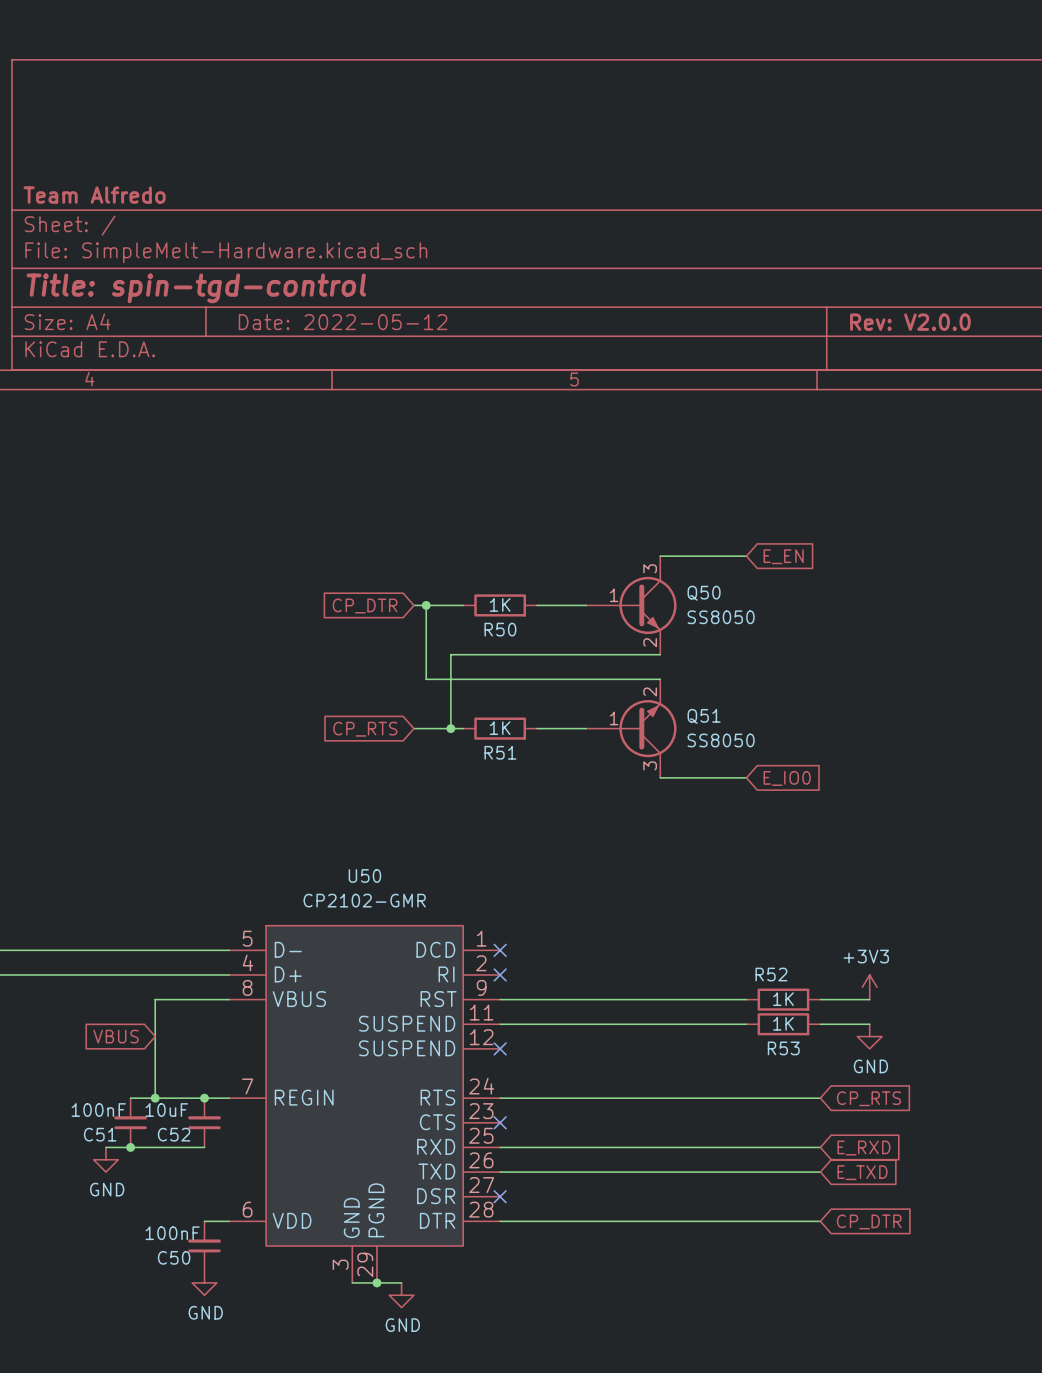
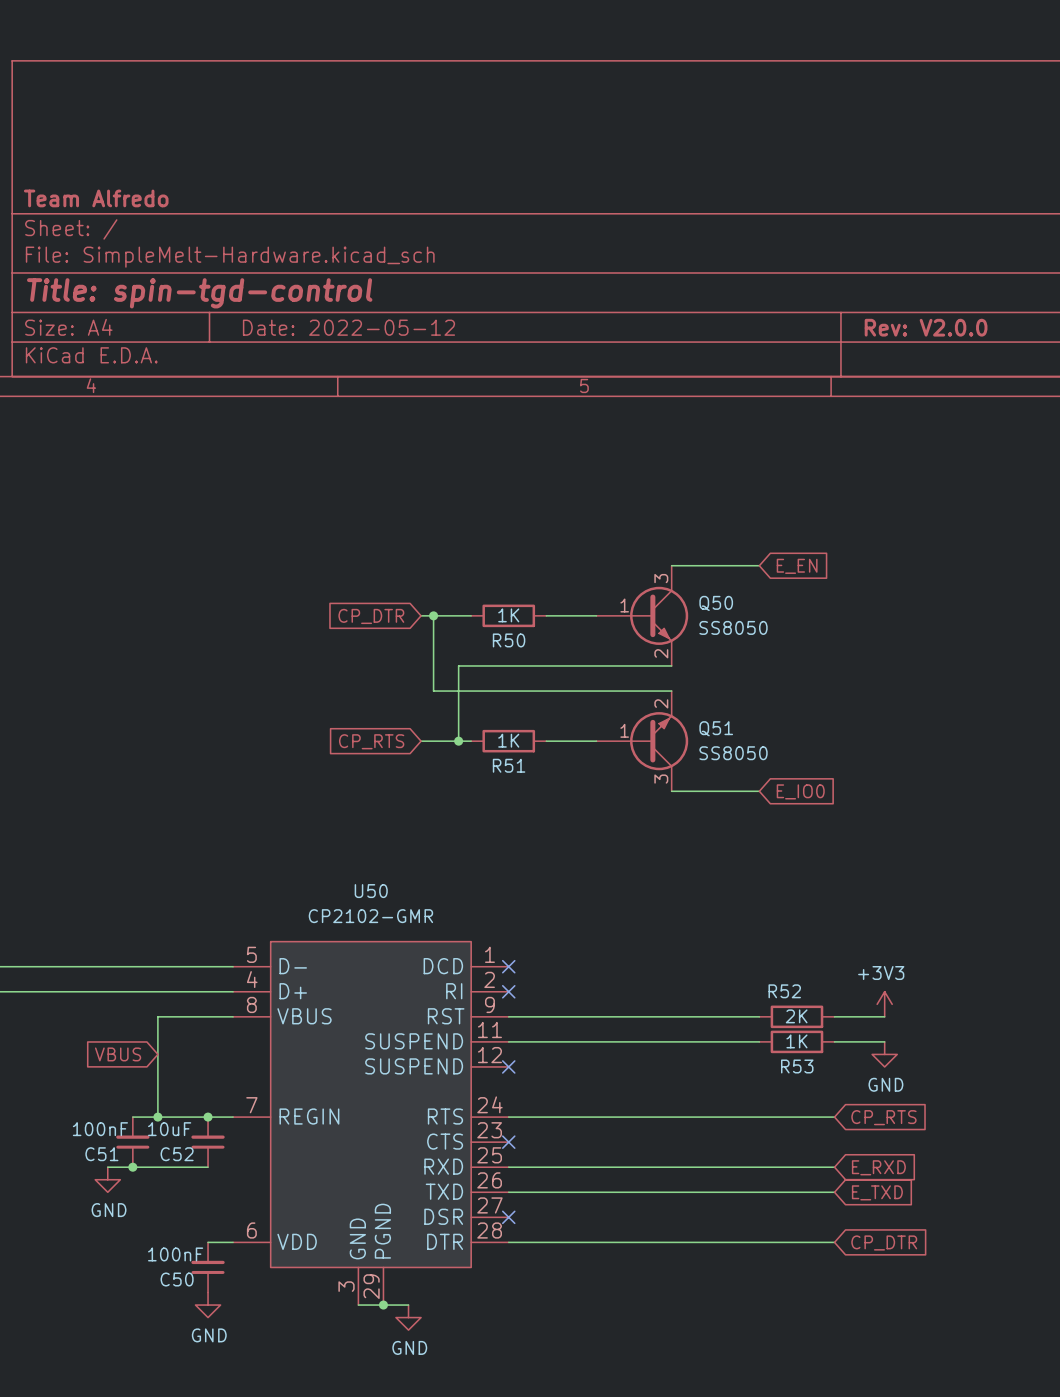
R52 value: 1K (783, 999) -> 2K (796, 1016)

